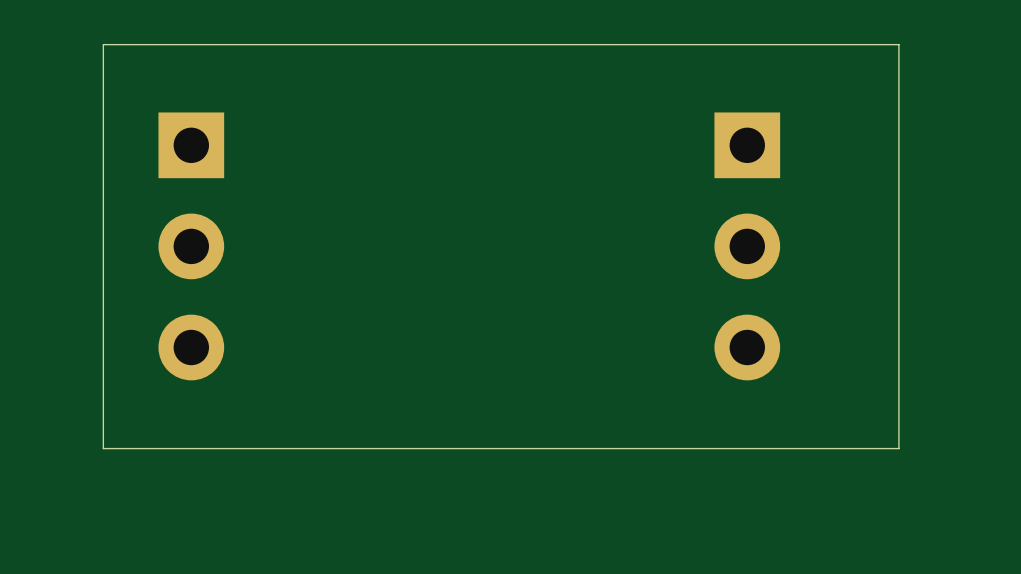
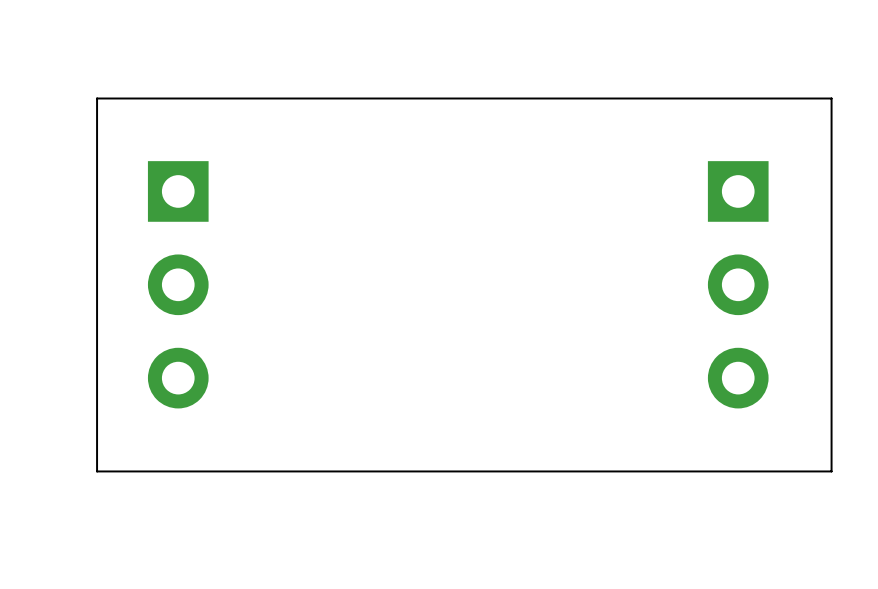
part position: (747, 246) -> (738, 284)

